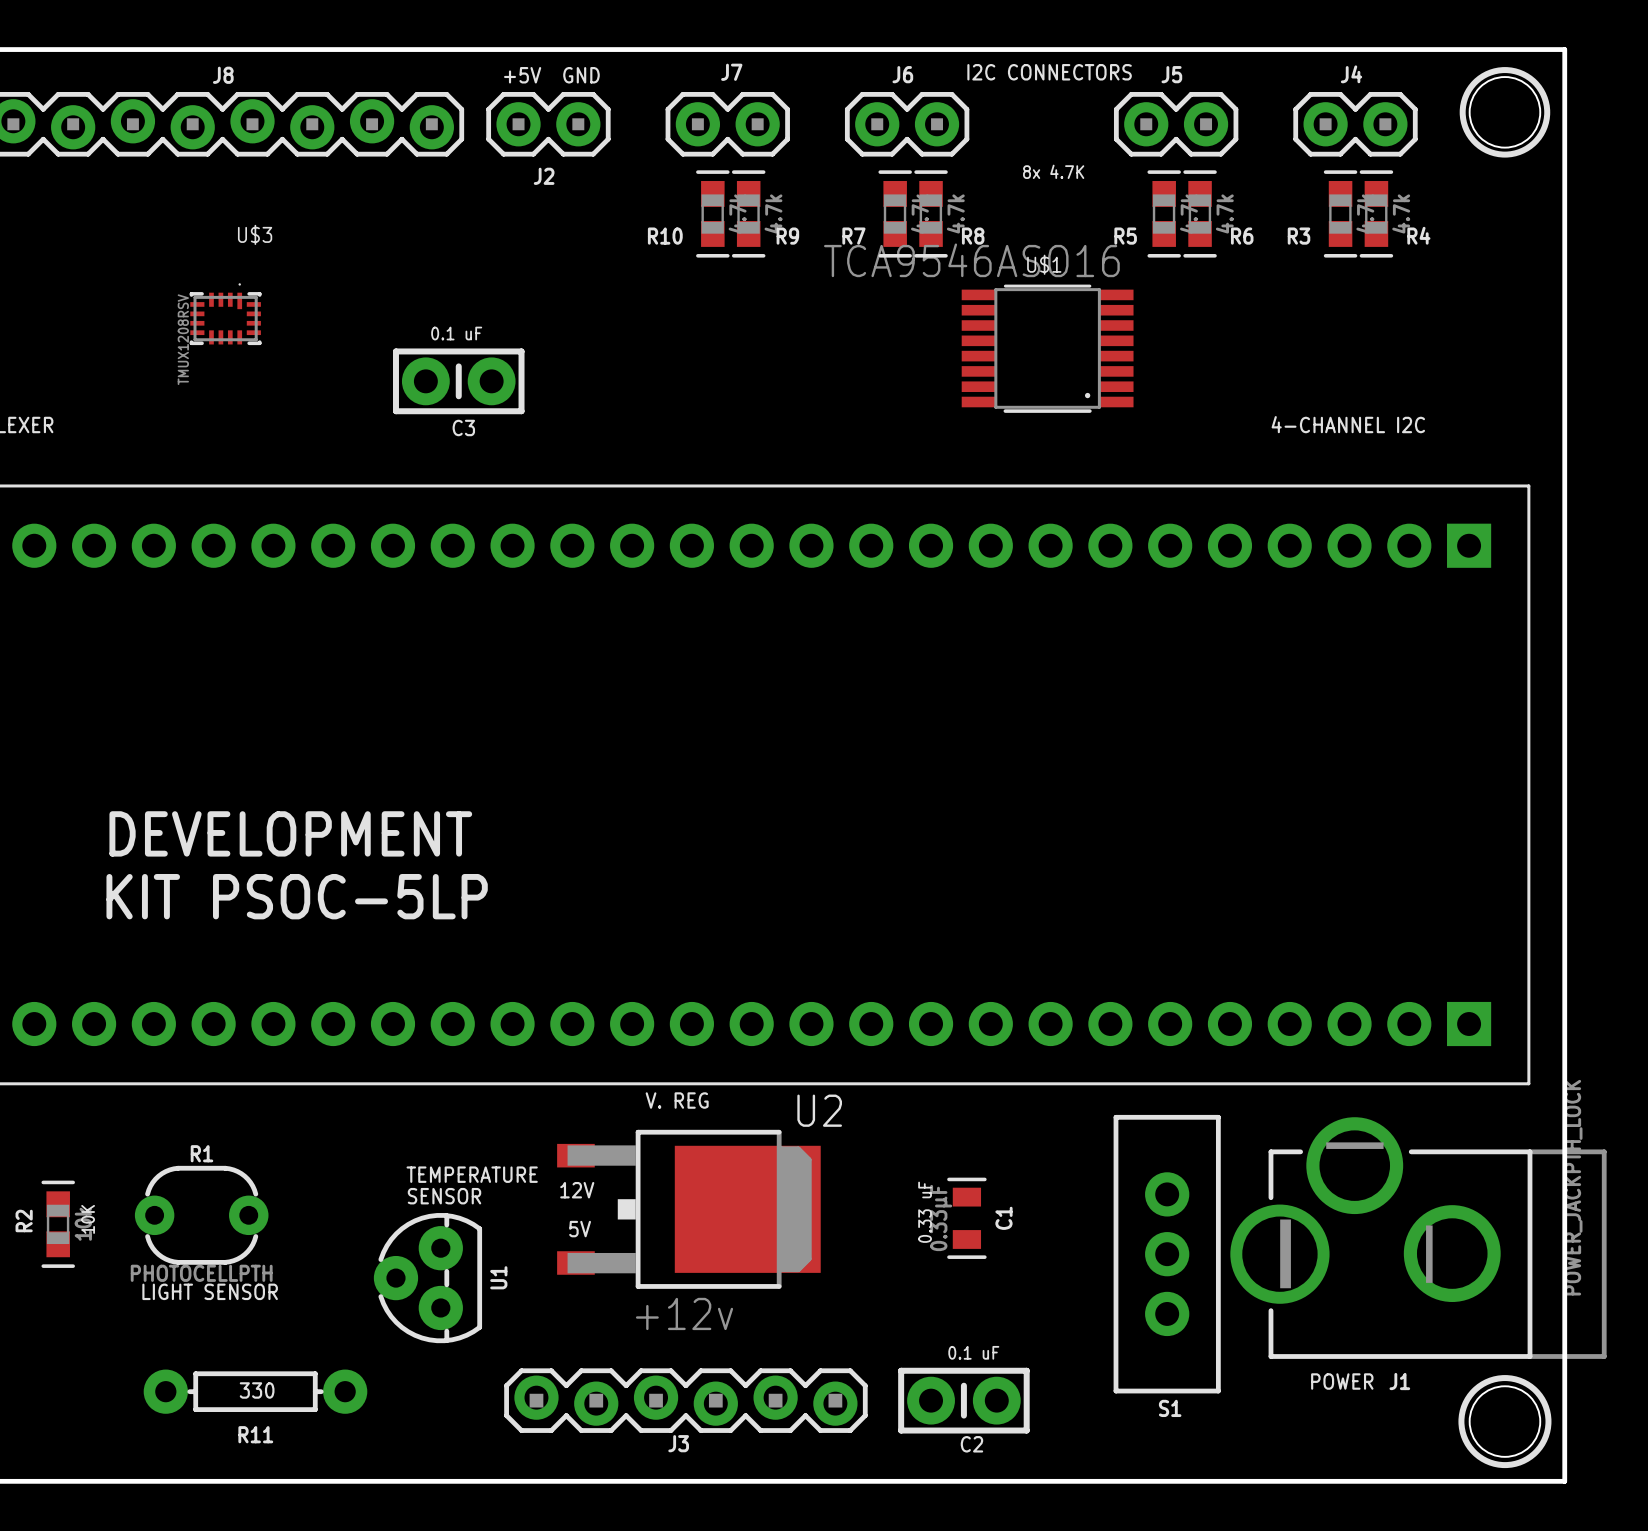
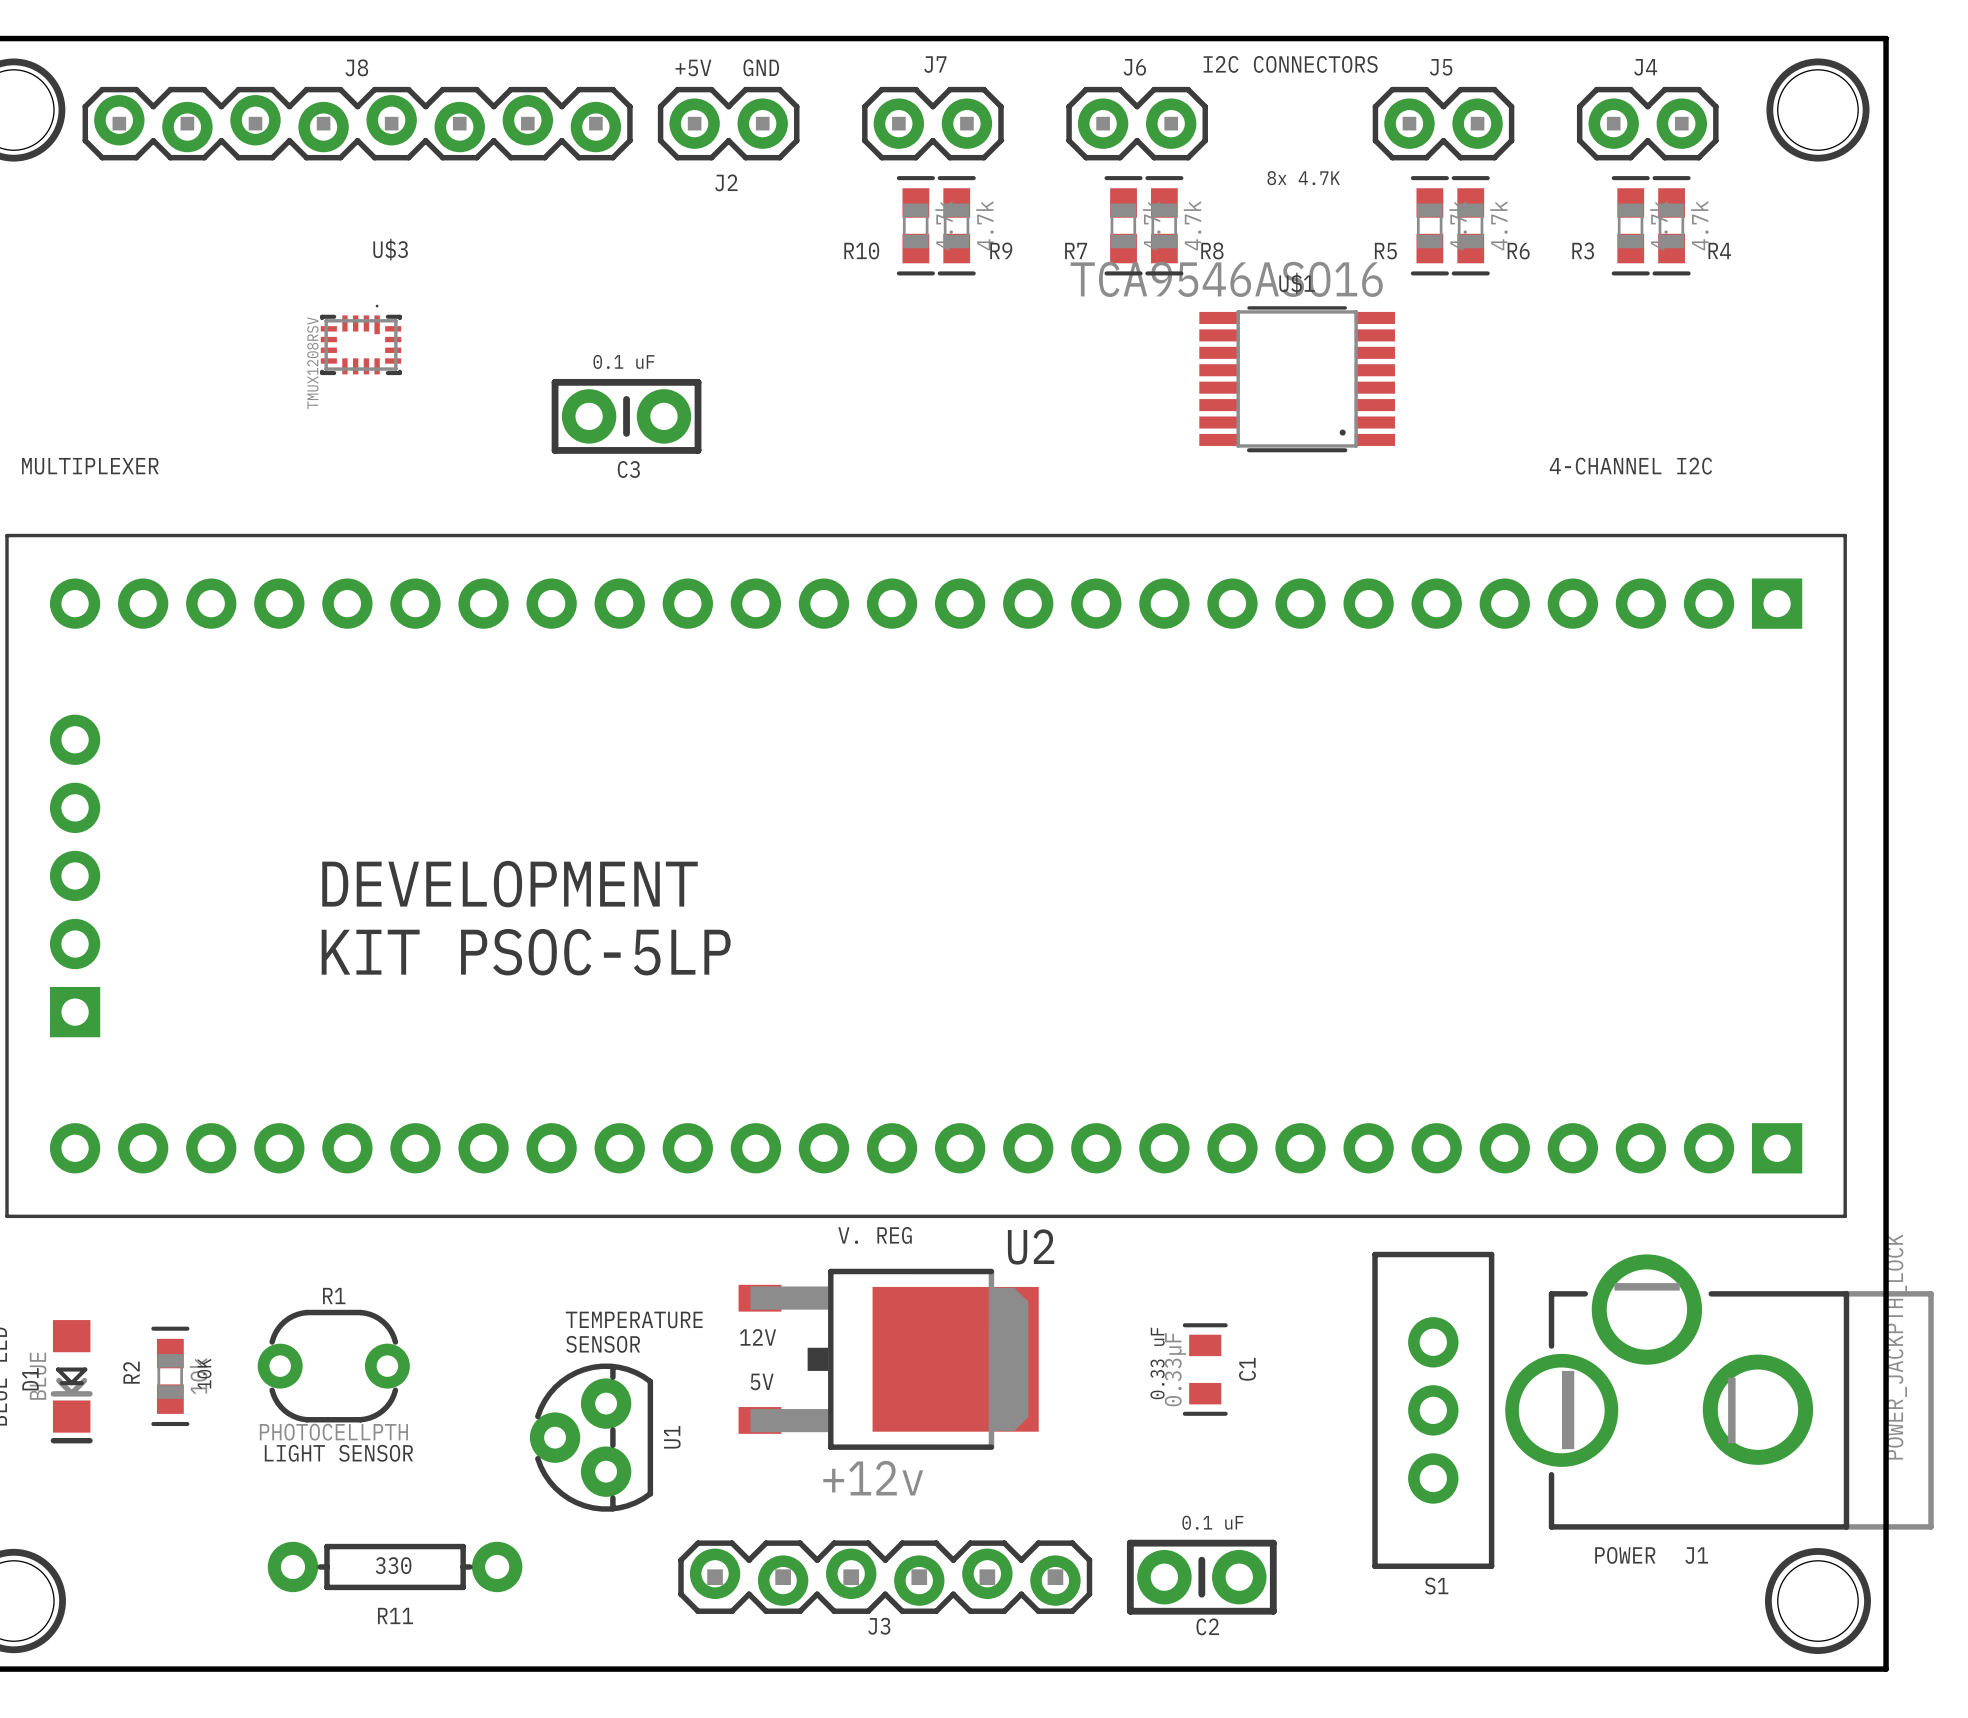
text position: DEVELOPMENT (290, 833) -> DEVELOPMENT (509, 884)
text position: KIT PSOC-5LP (297, 896) -> KIT PSOC-5LP (526, 952)

